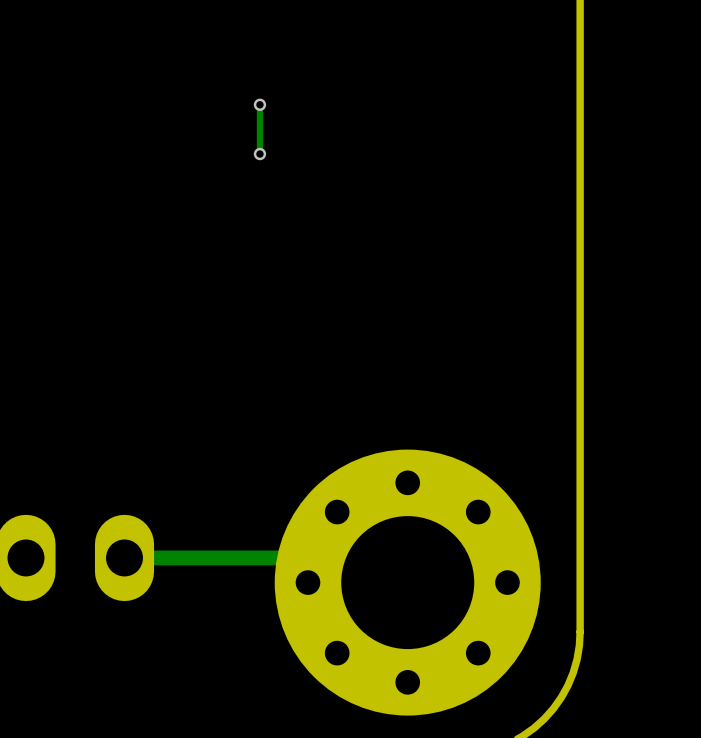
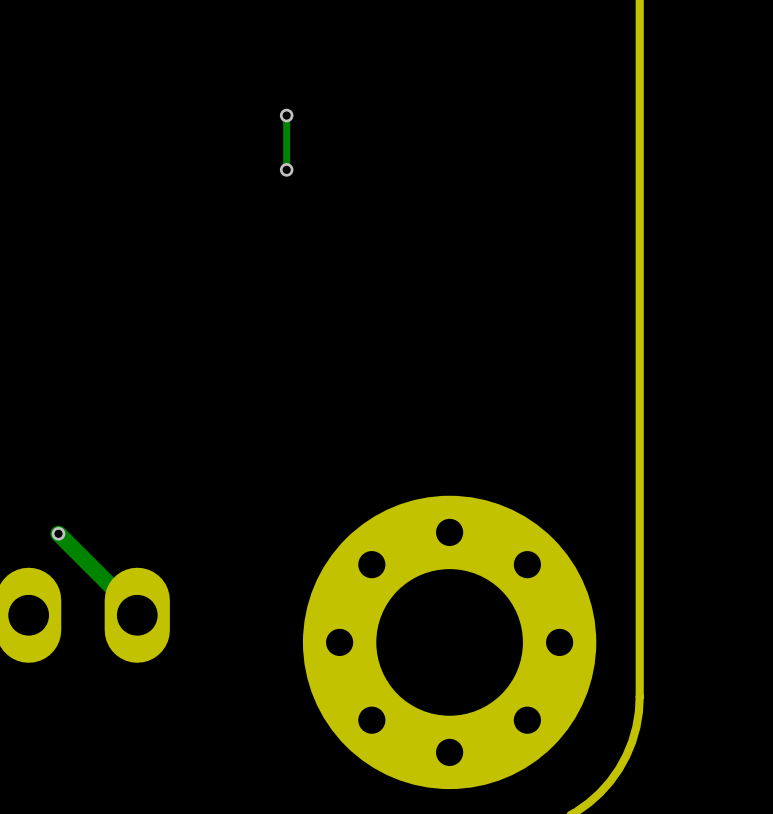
via: none -> (58, 533)
track: (126, 557) (284, 557) (309, 582) -> (140, 615) (58, 533)

